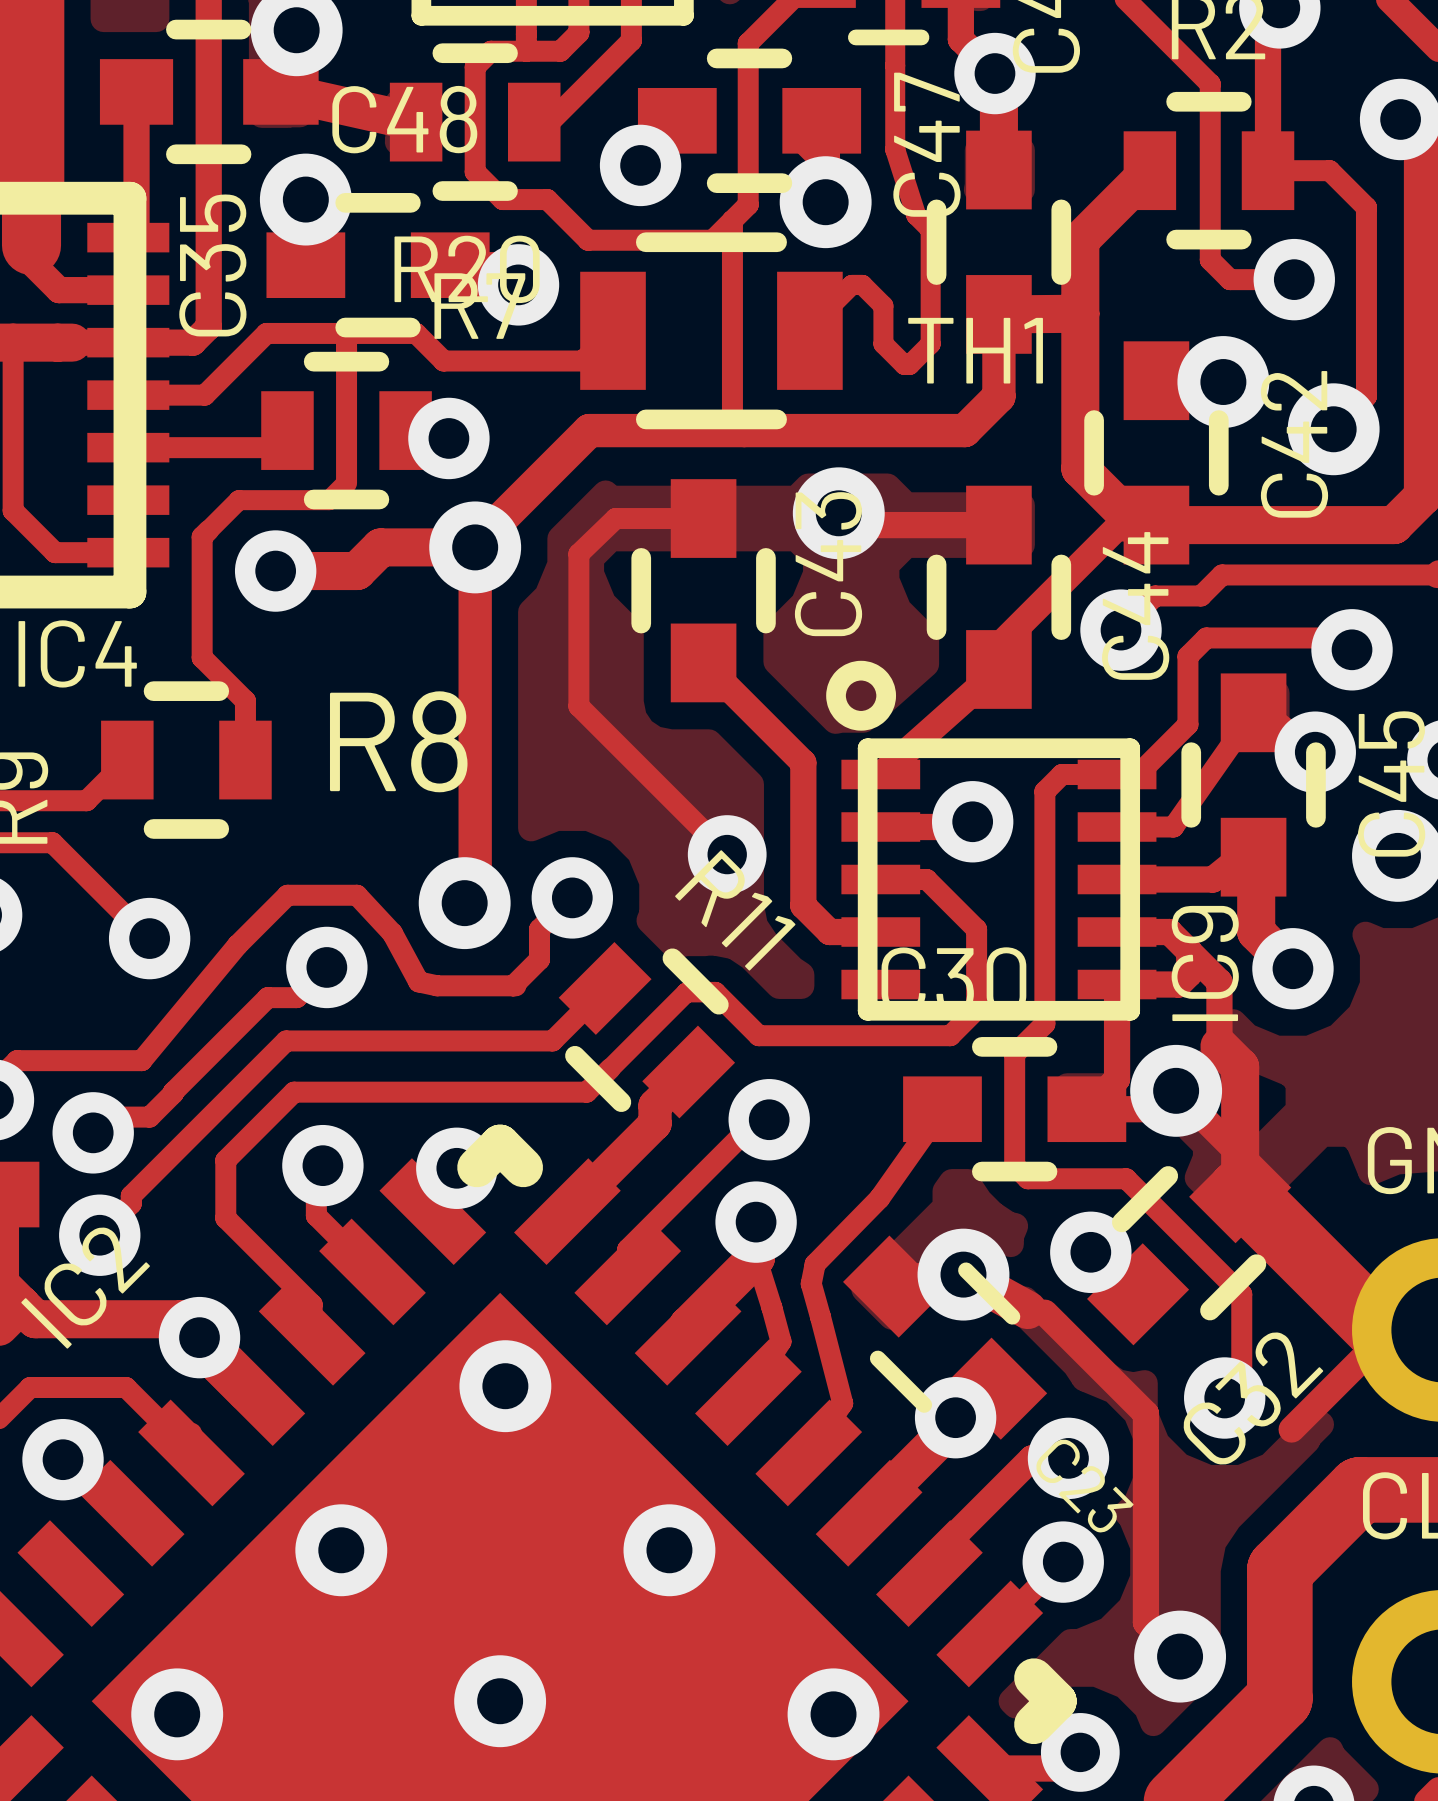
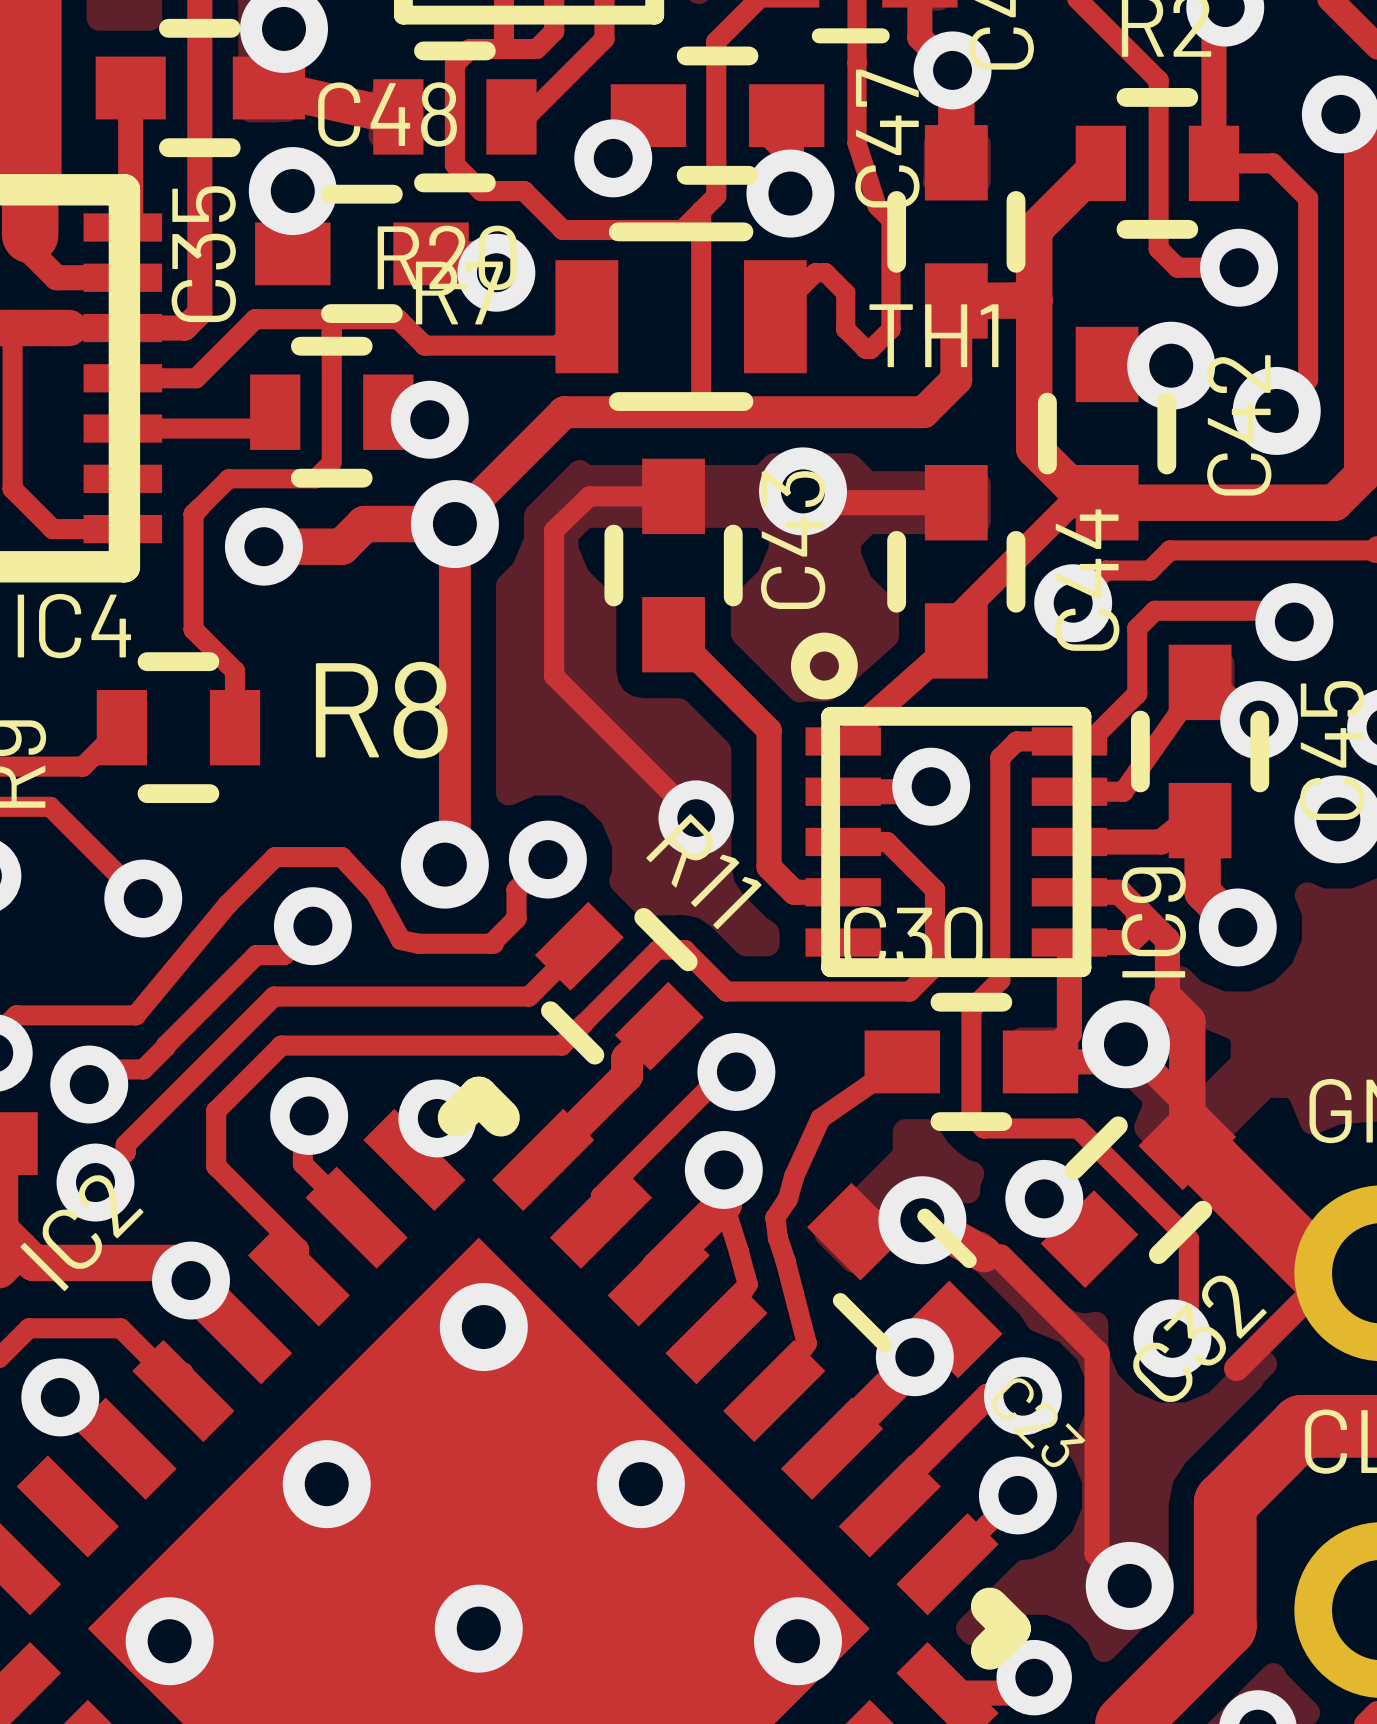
track: (942, 1109) (879, 1198) (815, 1264) (811, 1283) (820, 1316) -> (902, 1061) (820, 1118) (794, 1176) (787, 1198) (775, 1217) (777, 1237) (785, 1260)

